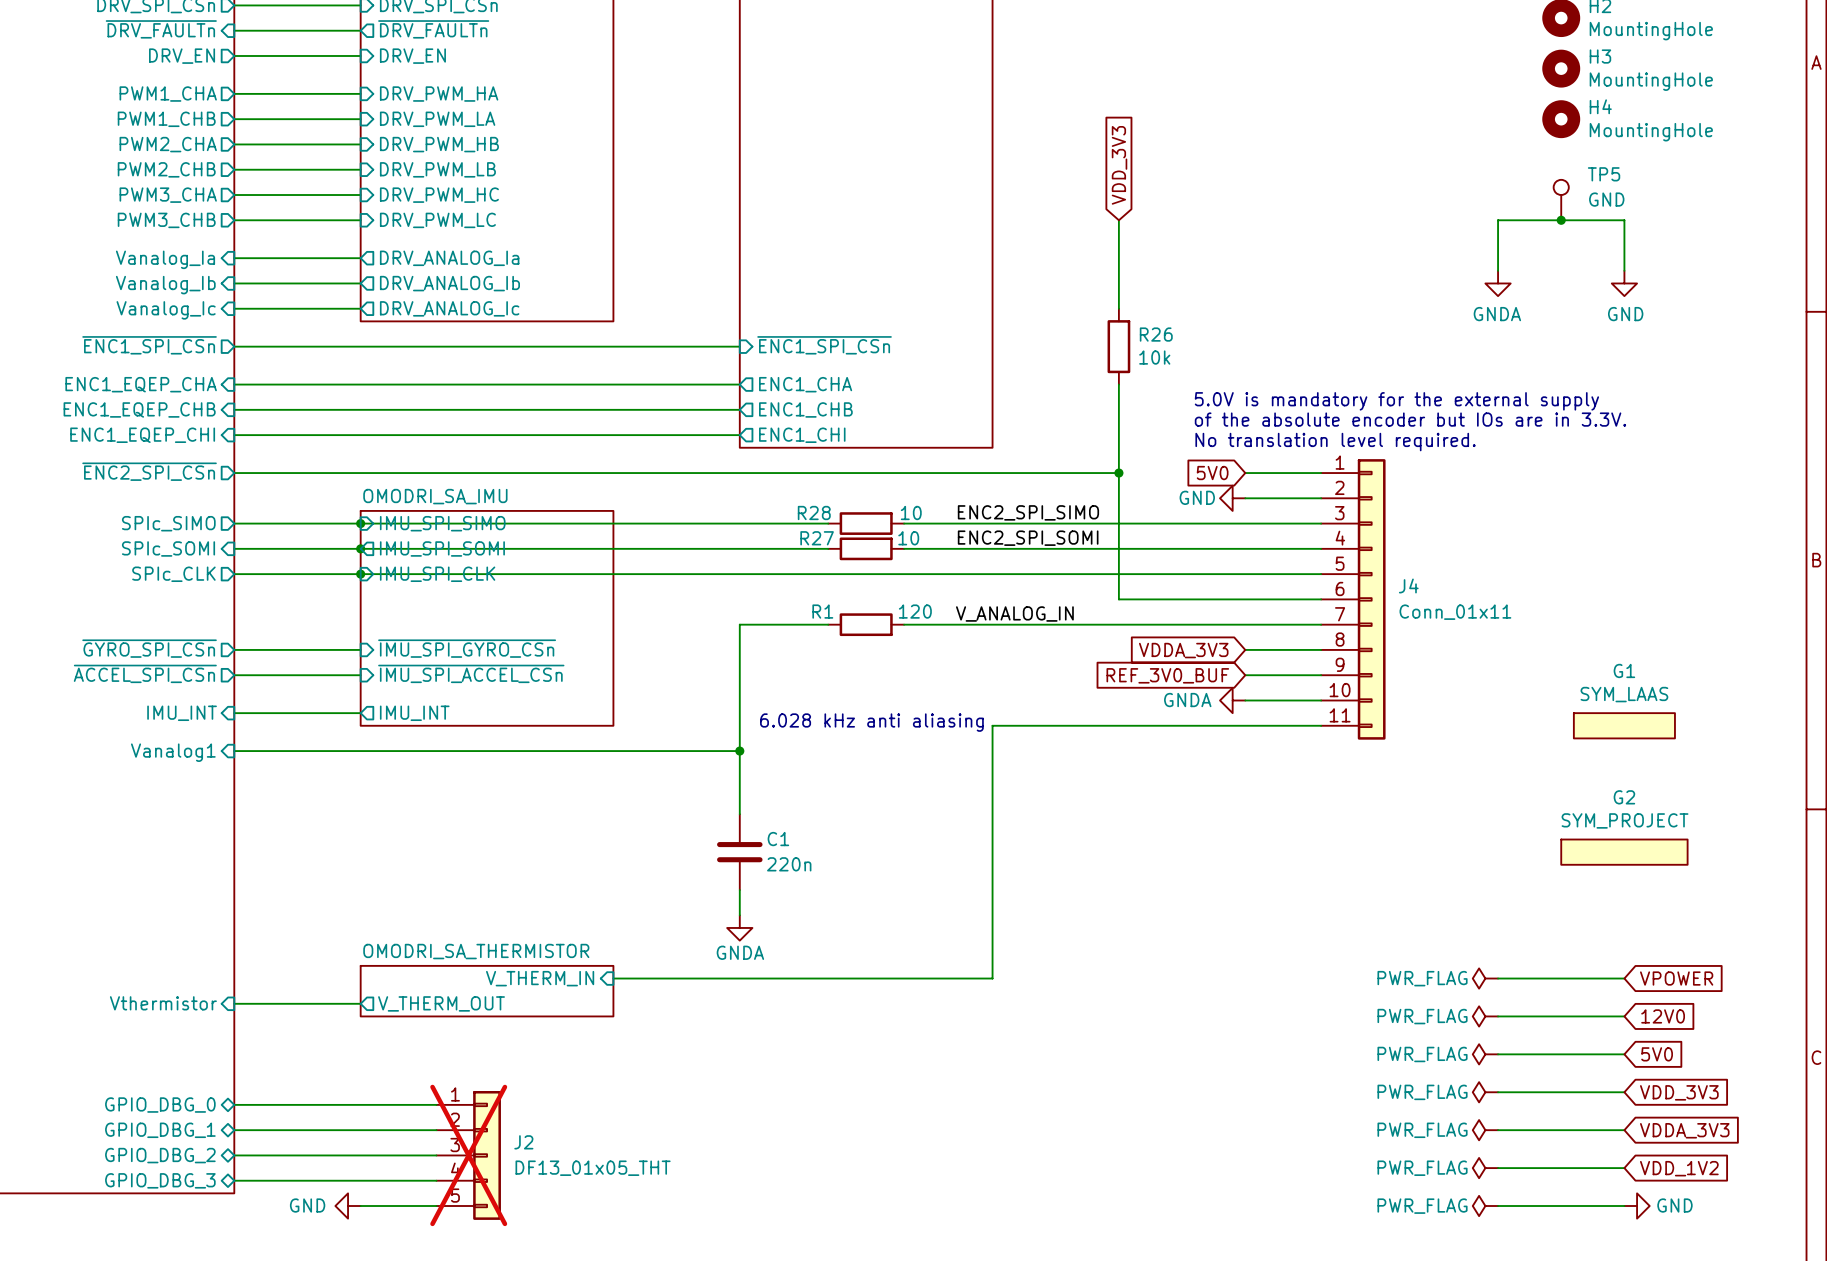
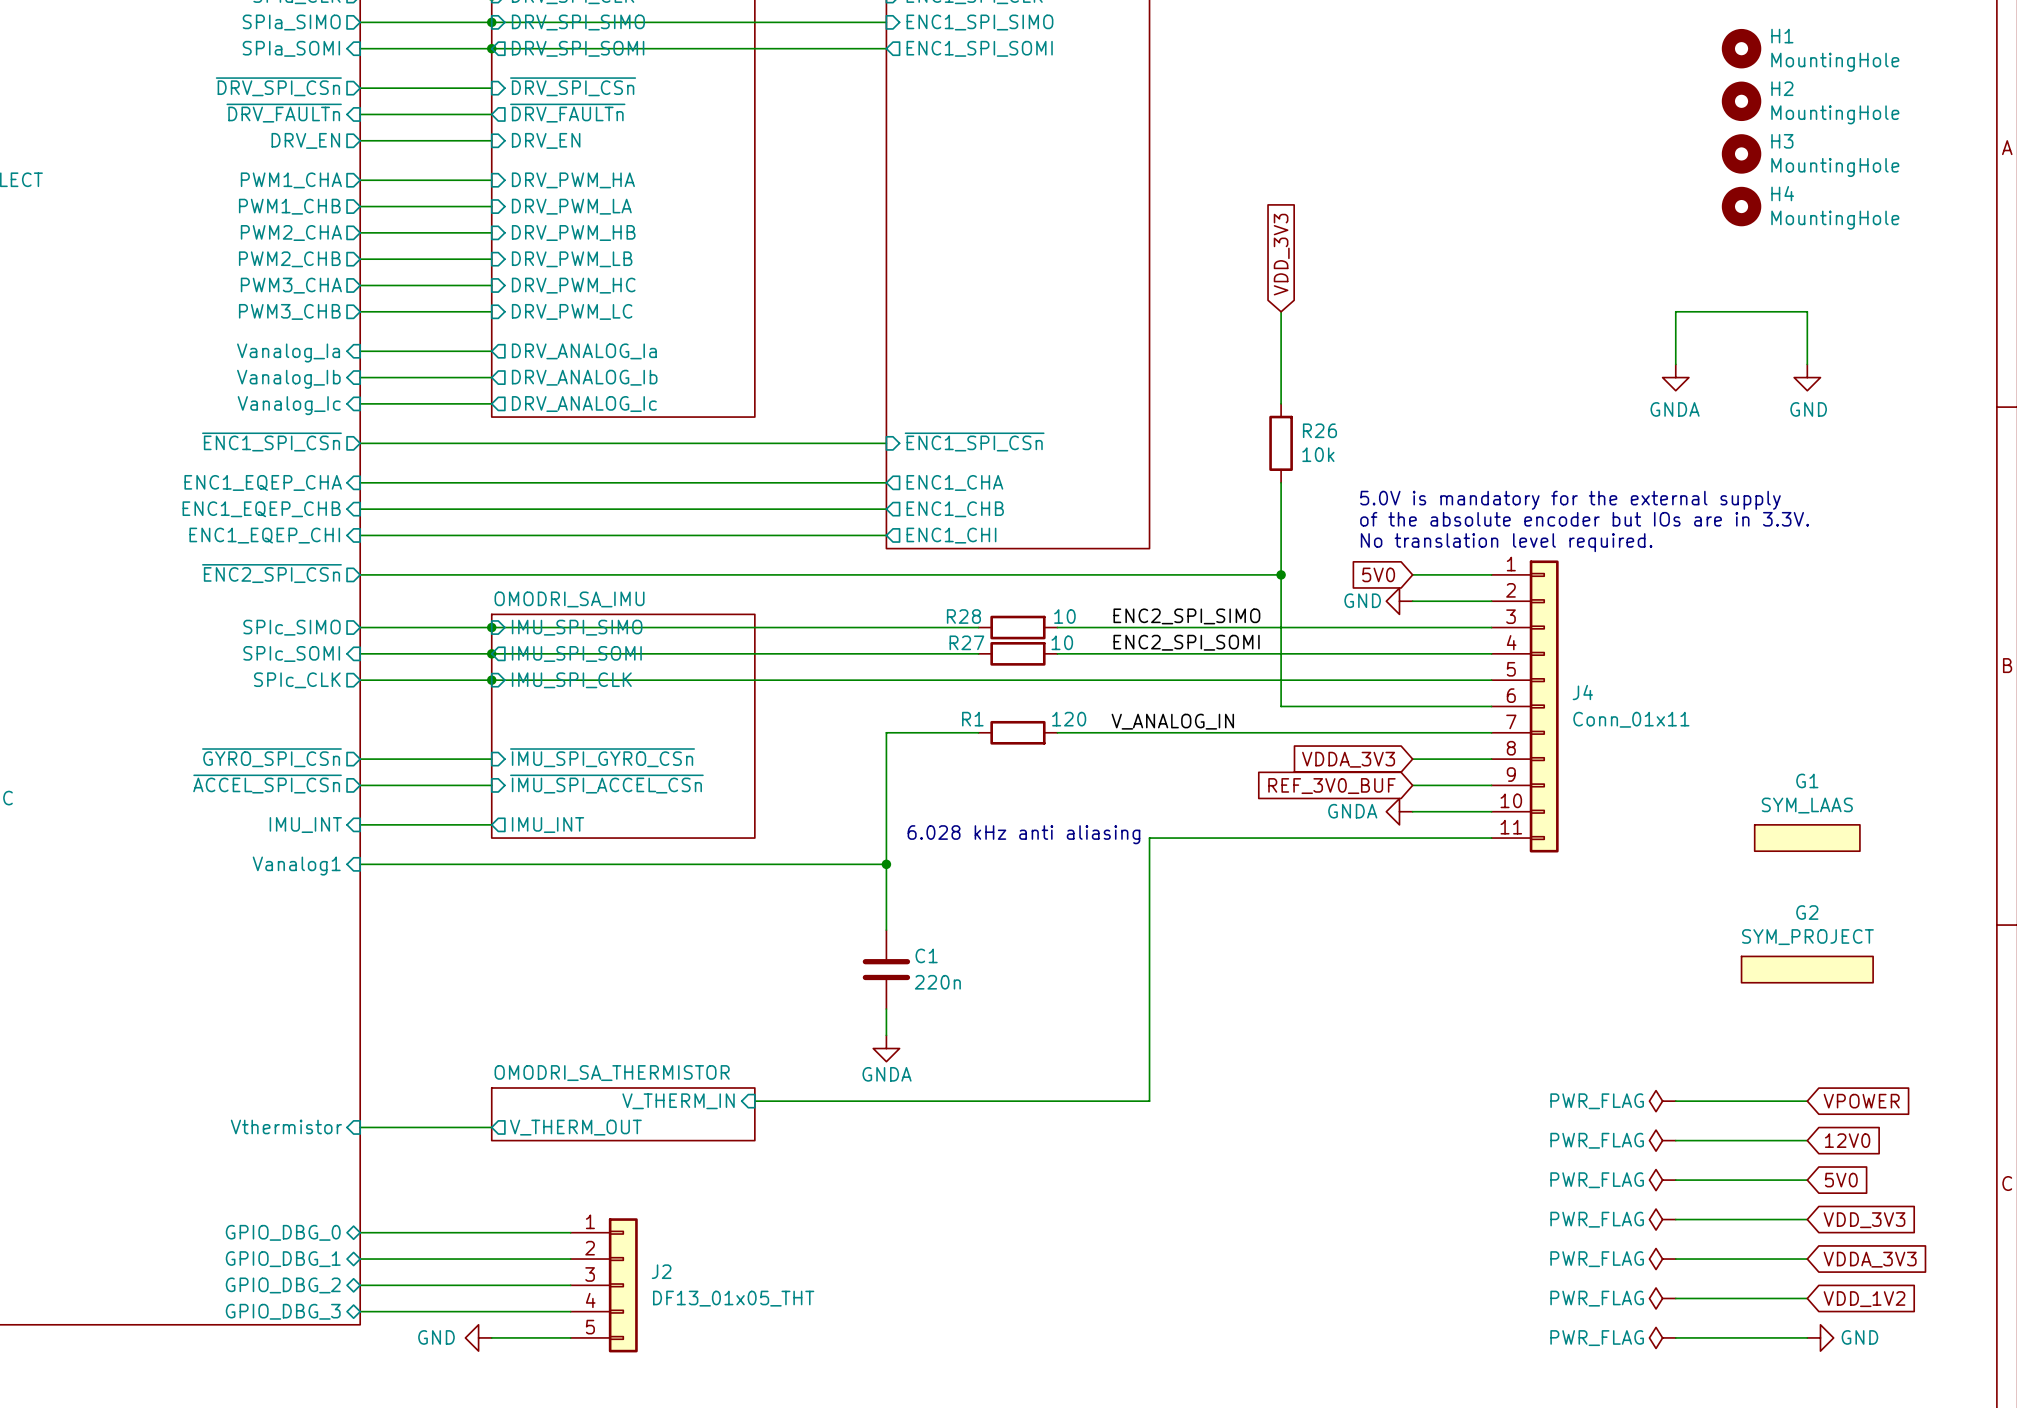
TP5: GND (1561, 200) -> none
junction: (1561, 220) -> none
J2 do-not-place cross: (468, 1155) -> none

